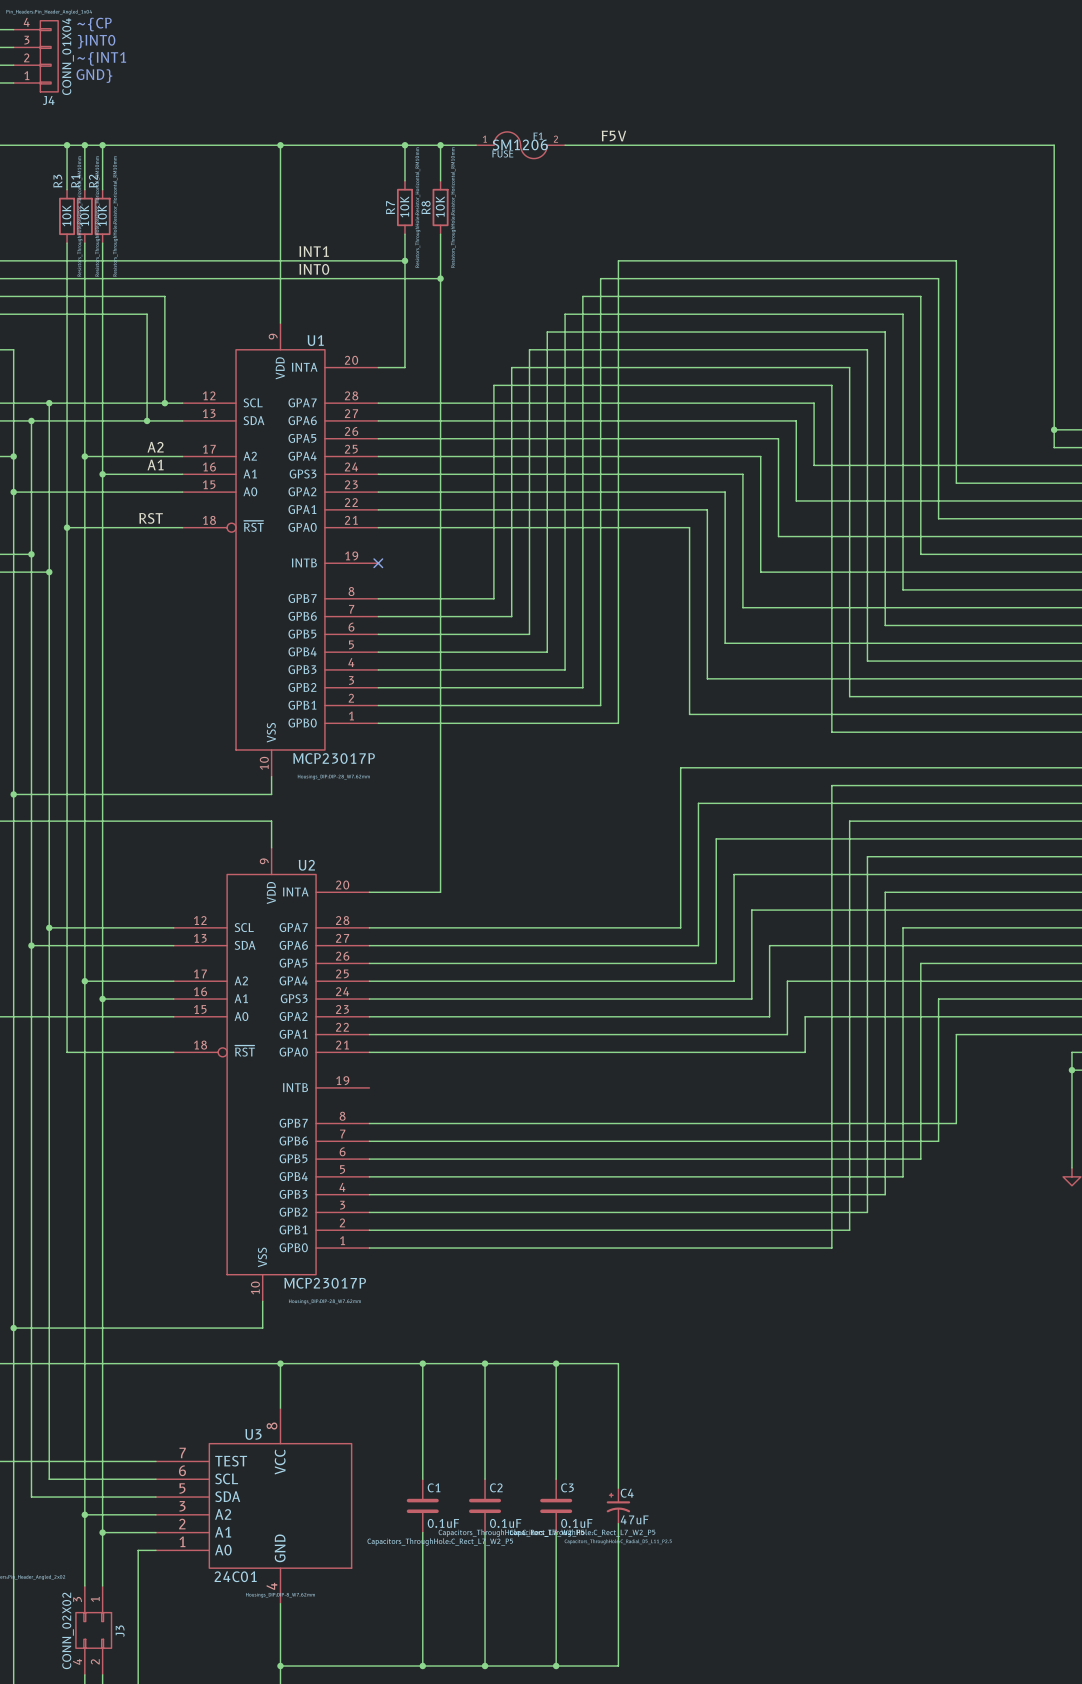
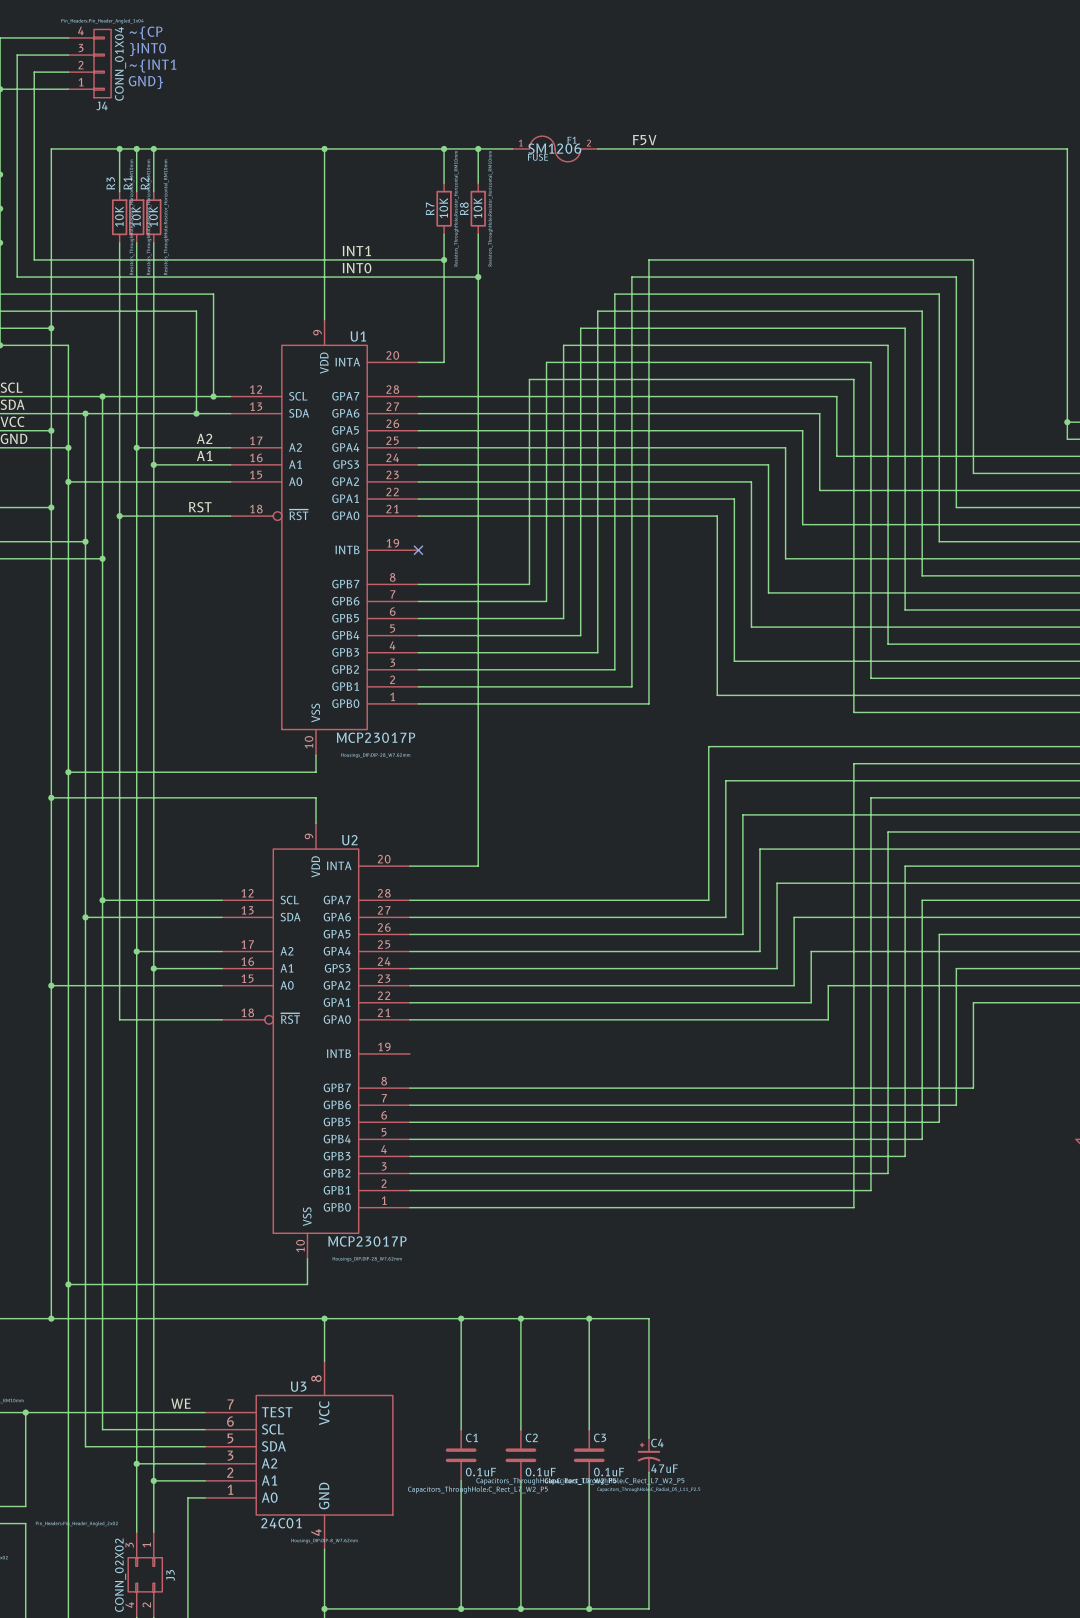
label: none -> WE (181, 1403)

